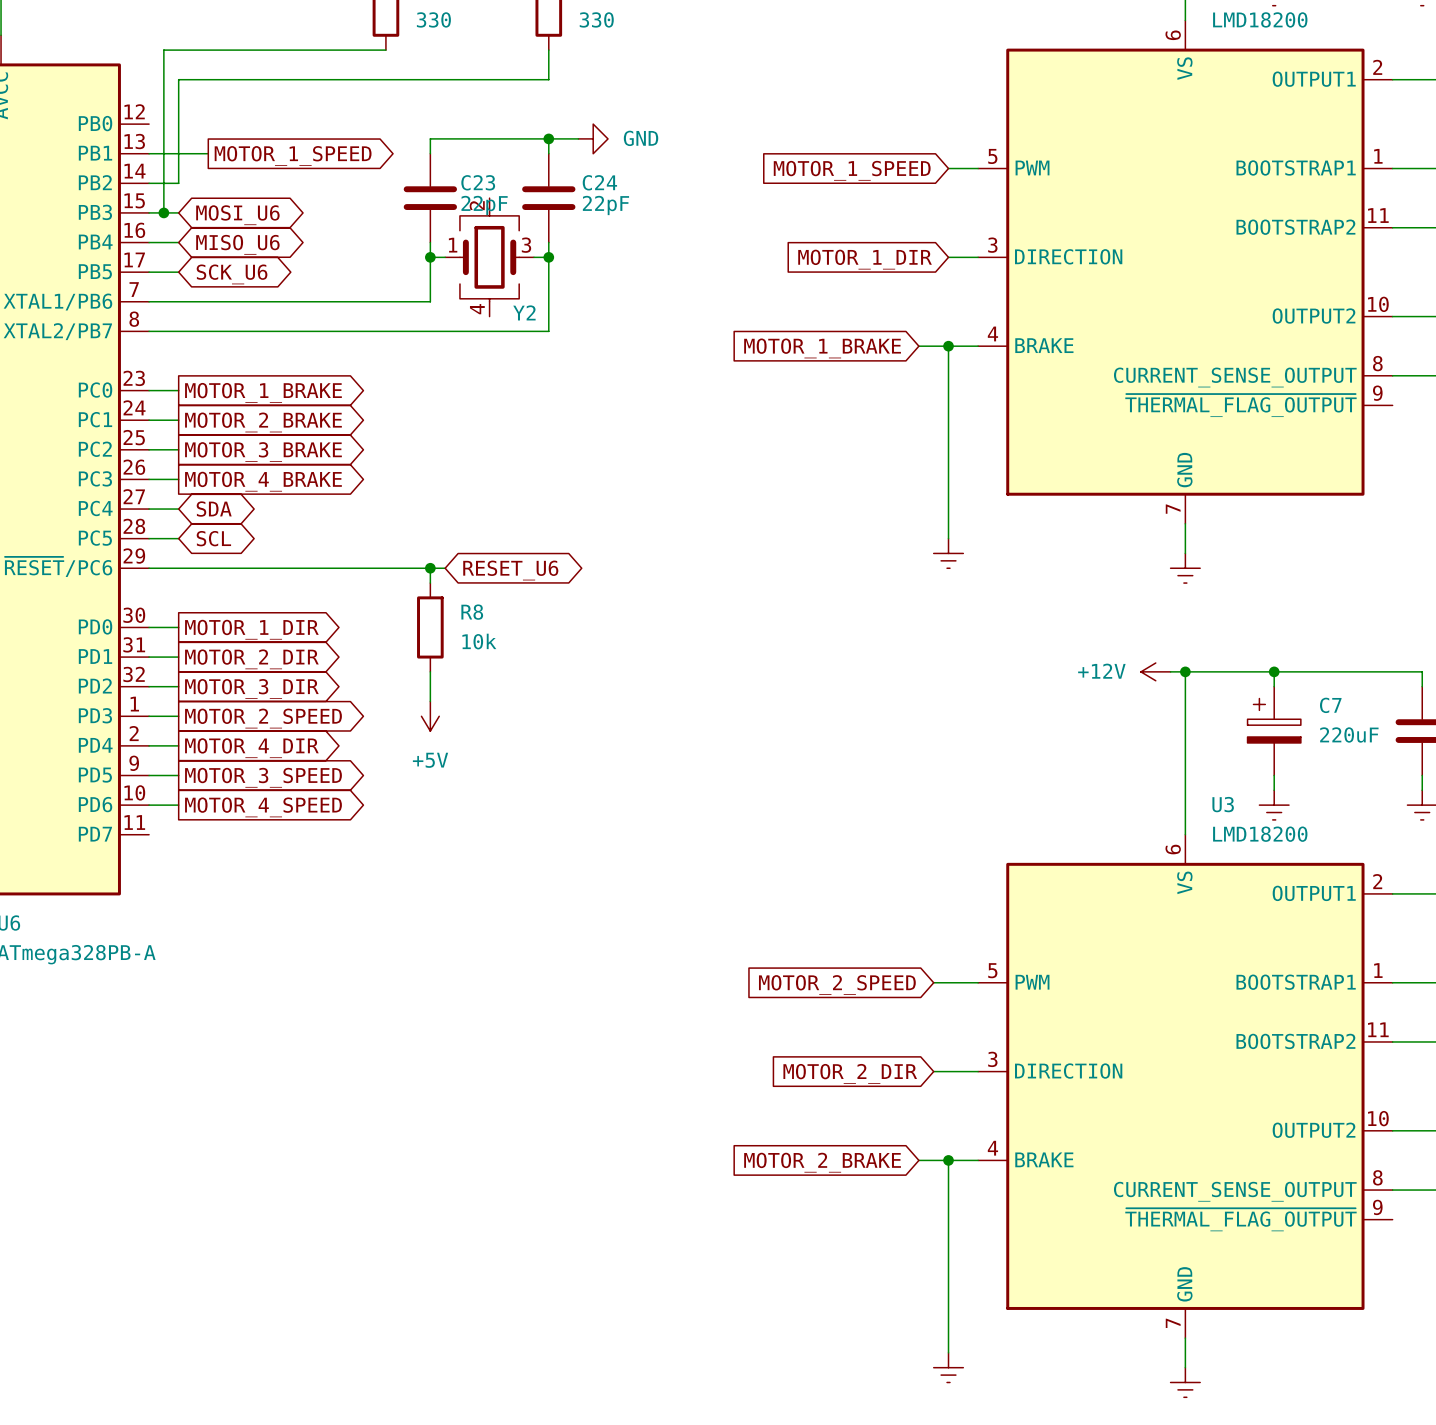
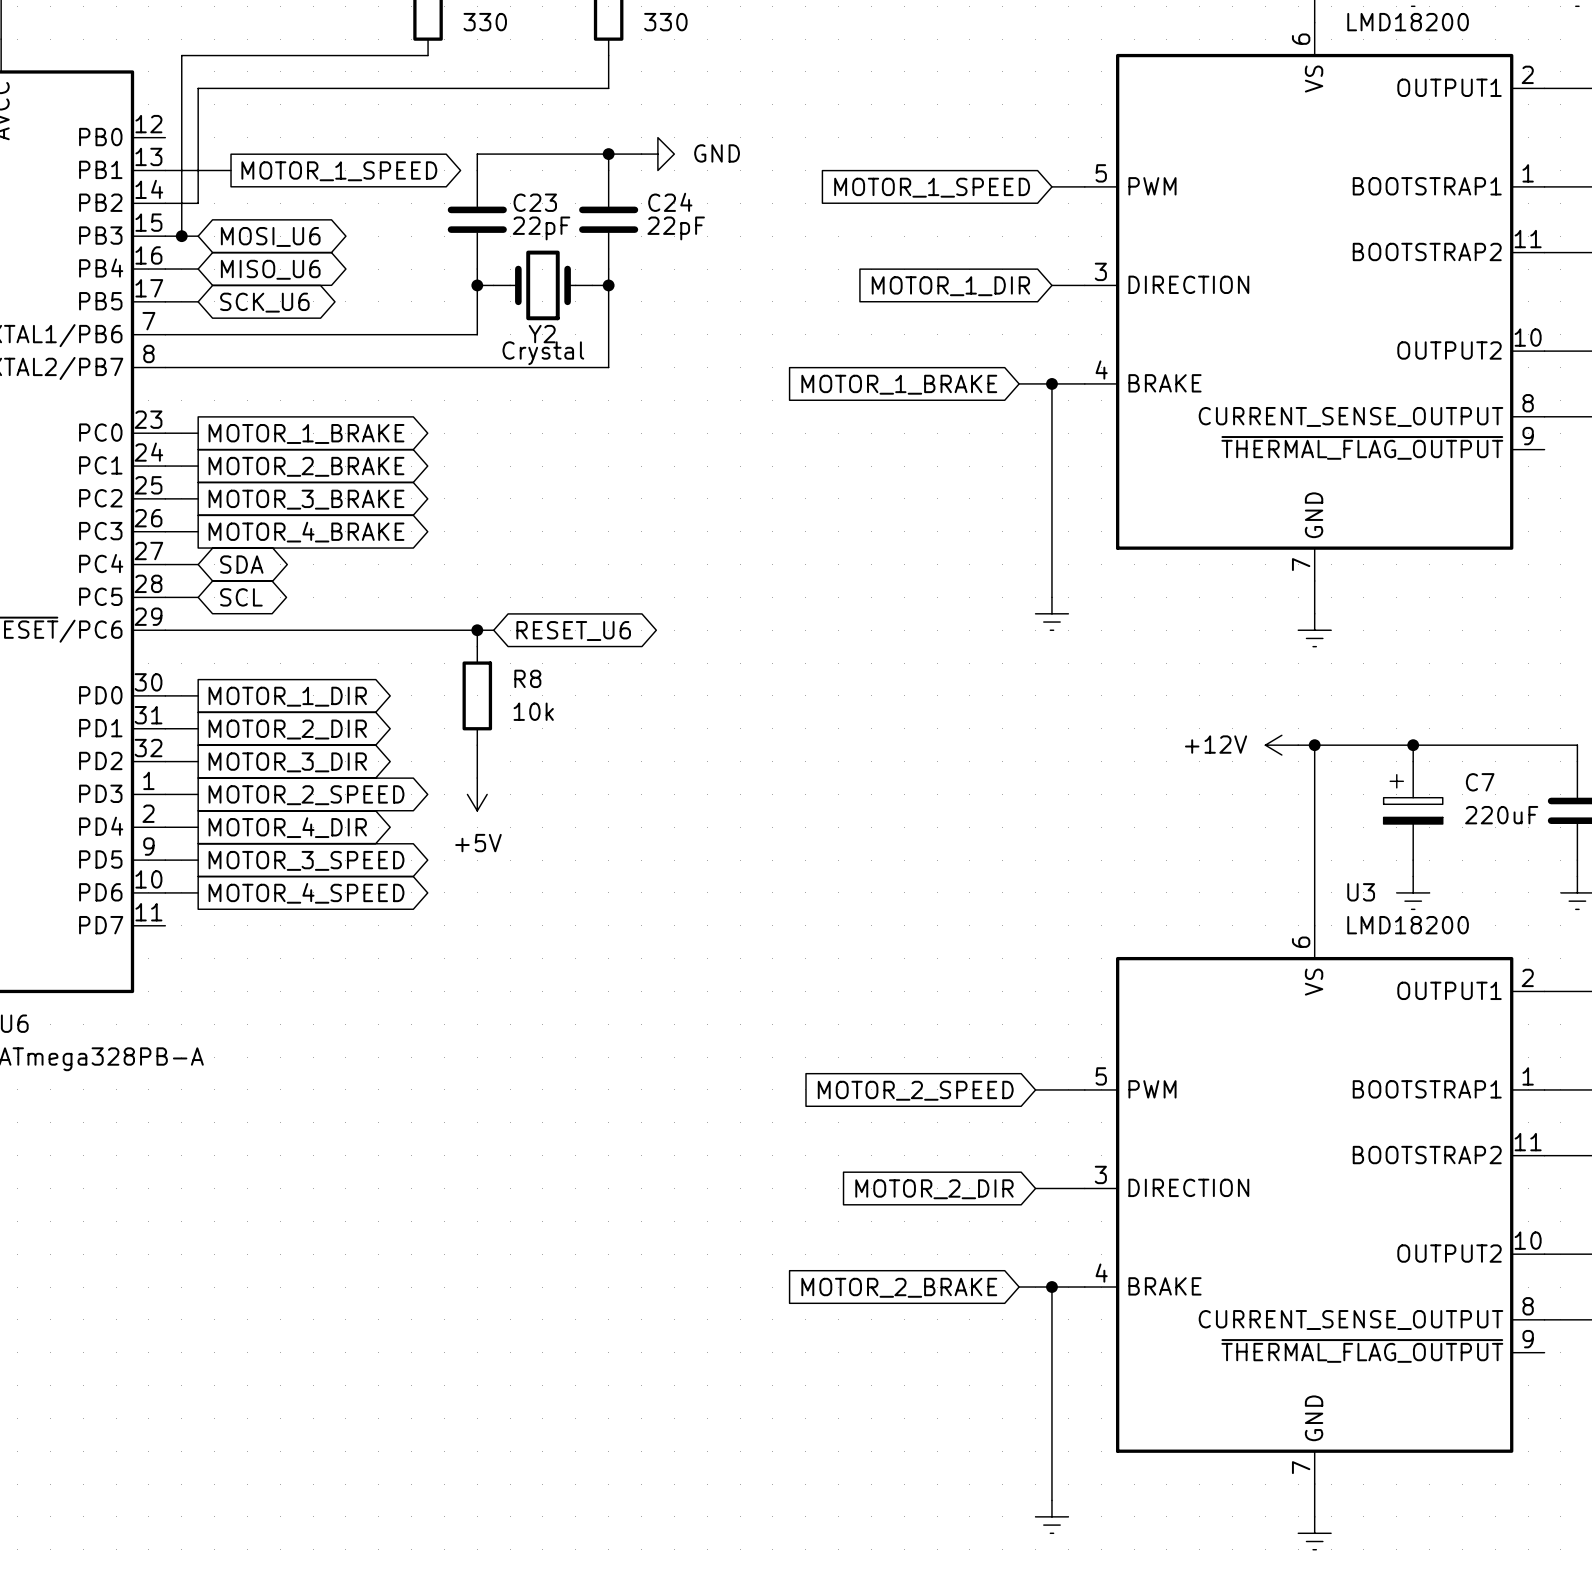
Y2 symbol: [445, 198, 534, 317] -> [493, 250, 593, 321]
Y2 name position: Y2 (524, 312) -> Y2 (542, 334)
Y2 value: none -> Crystal (543, 353)

